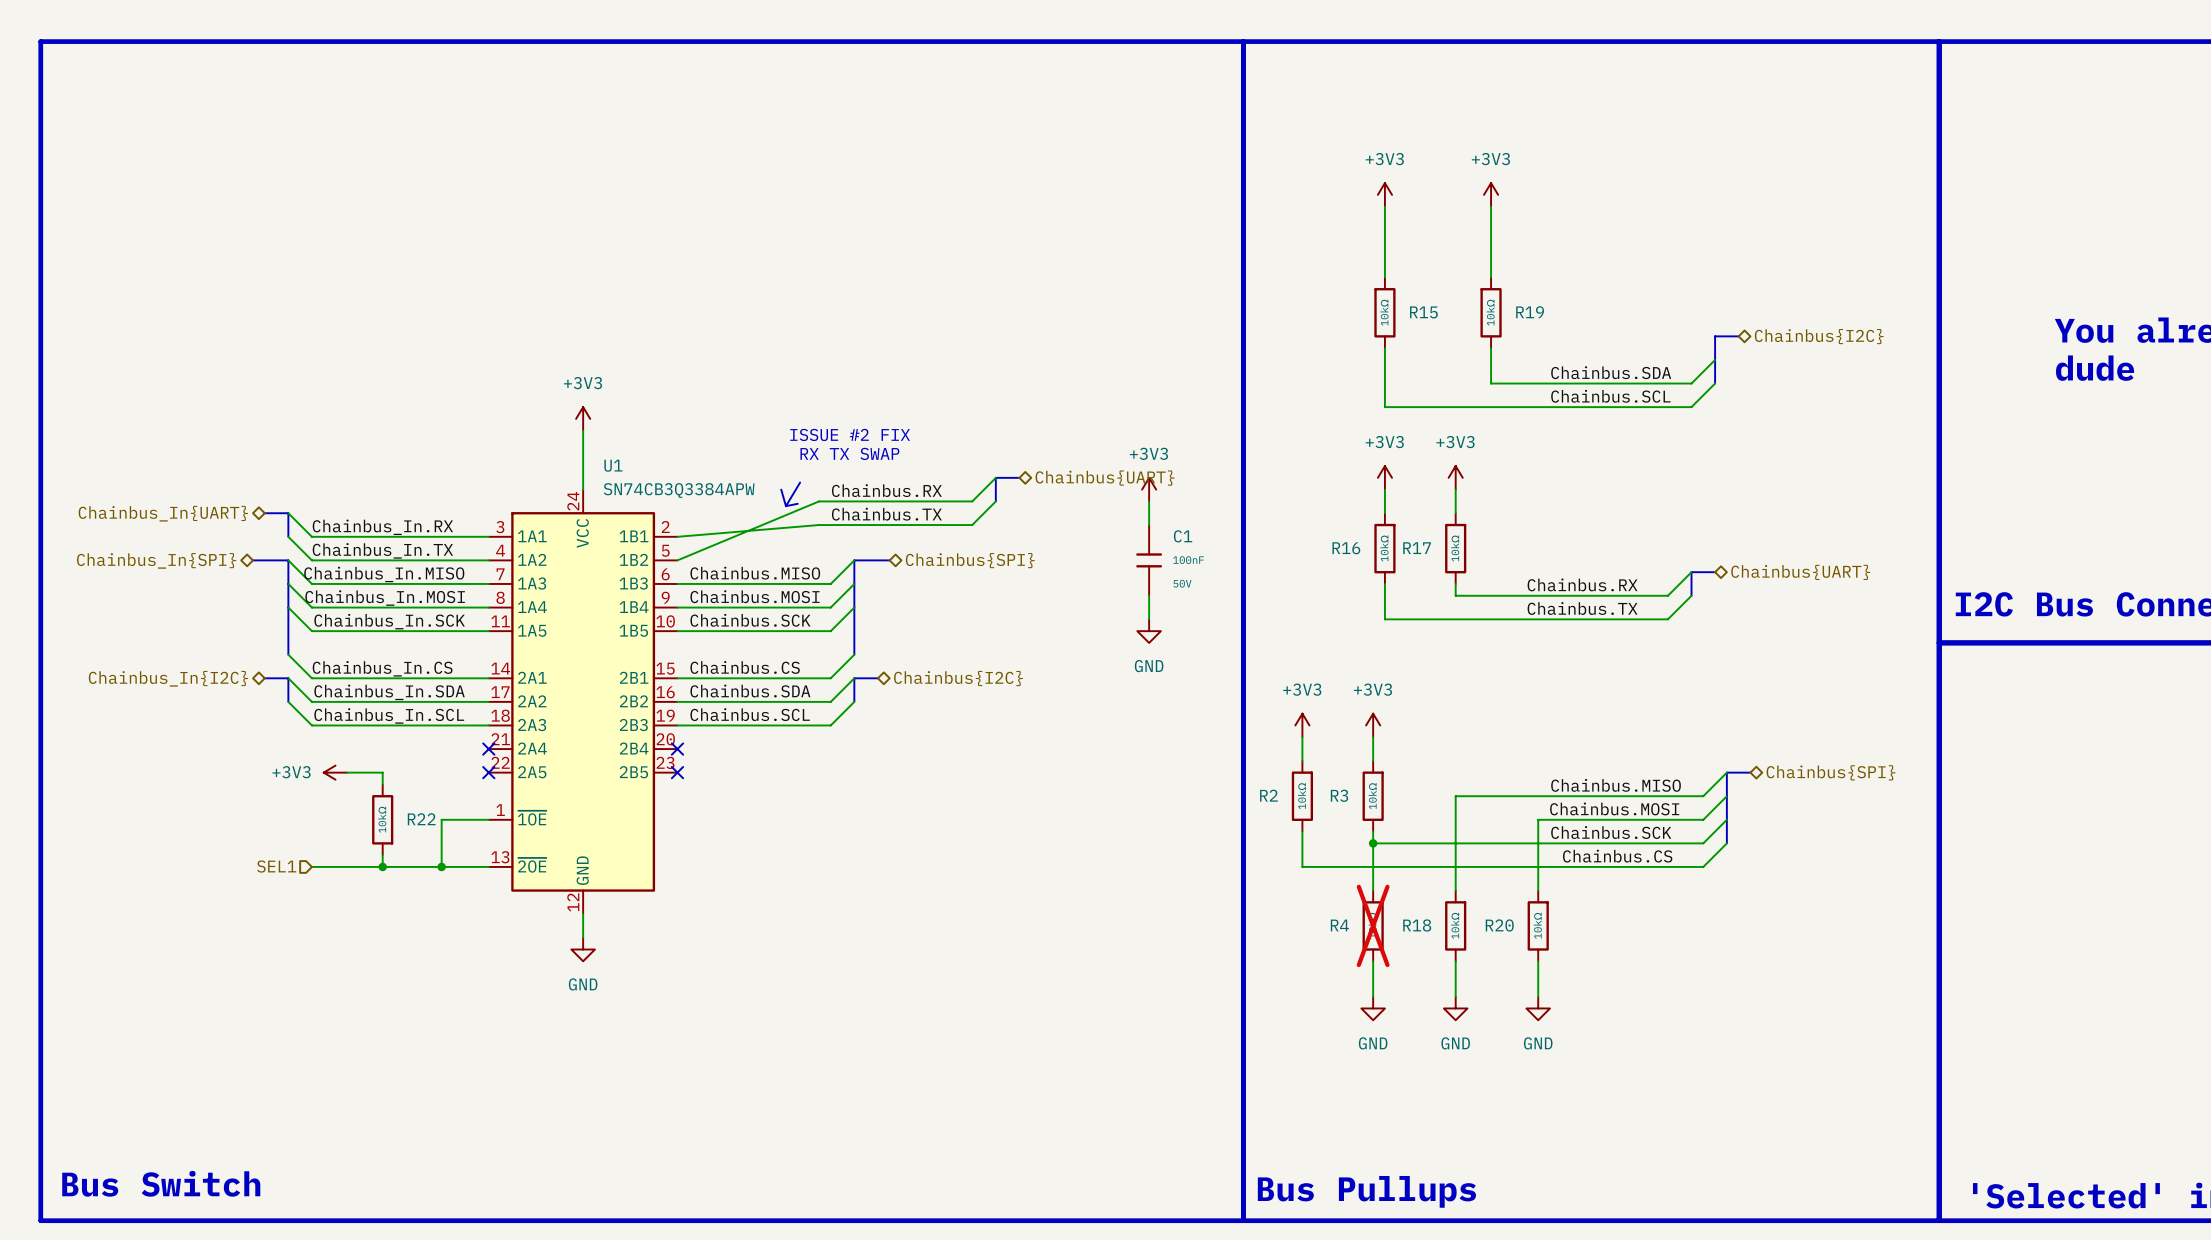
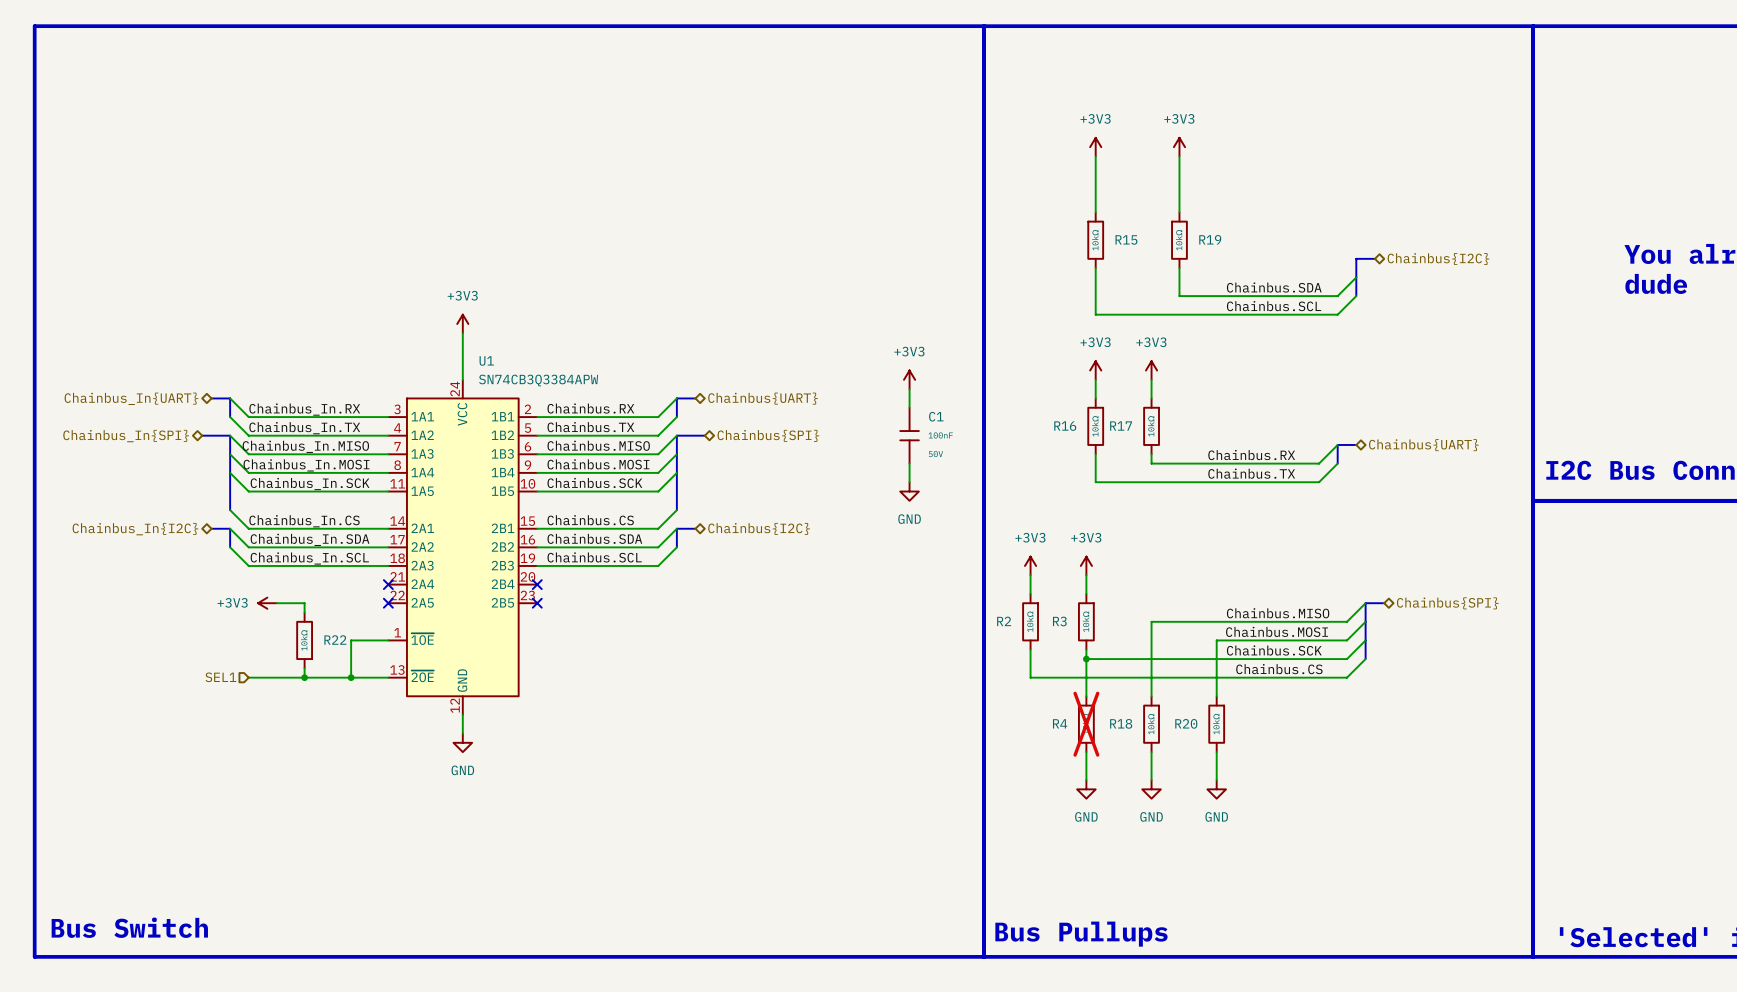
text: ISSUE #2 FIX (850, 434) -> none
text: RX TX SWAP (849, 453) -> none
wire: (995, 477) (972, 501) (818, 501) (677, 560) -> (676, 417) (658, 435) (537, 435)
bus: (1019, 477) (995, 477) (995, 501) -> (695, 398) (676, 398) (676, 417)
hierarchical label position: Chainbus{UART} (1105, 478) -> Chainbus{UART} (763, 398)
line: (800, 482) (785, 506) -> none
line: (781, 489) (785, 506) -> none
label position: Chainbus.RX (886, 490) -> Chainbus.RX (590, 408)
wire: (995, 501) (972, 525) (818, 525) (677, 536) -> (676, 398) (658, 417) (537, 417)
line: (797, 503) (785, 506) -> none
label position: Chainbus.TX (886, 514) -> Chainbus.TX (590, 427)

